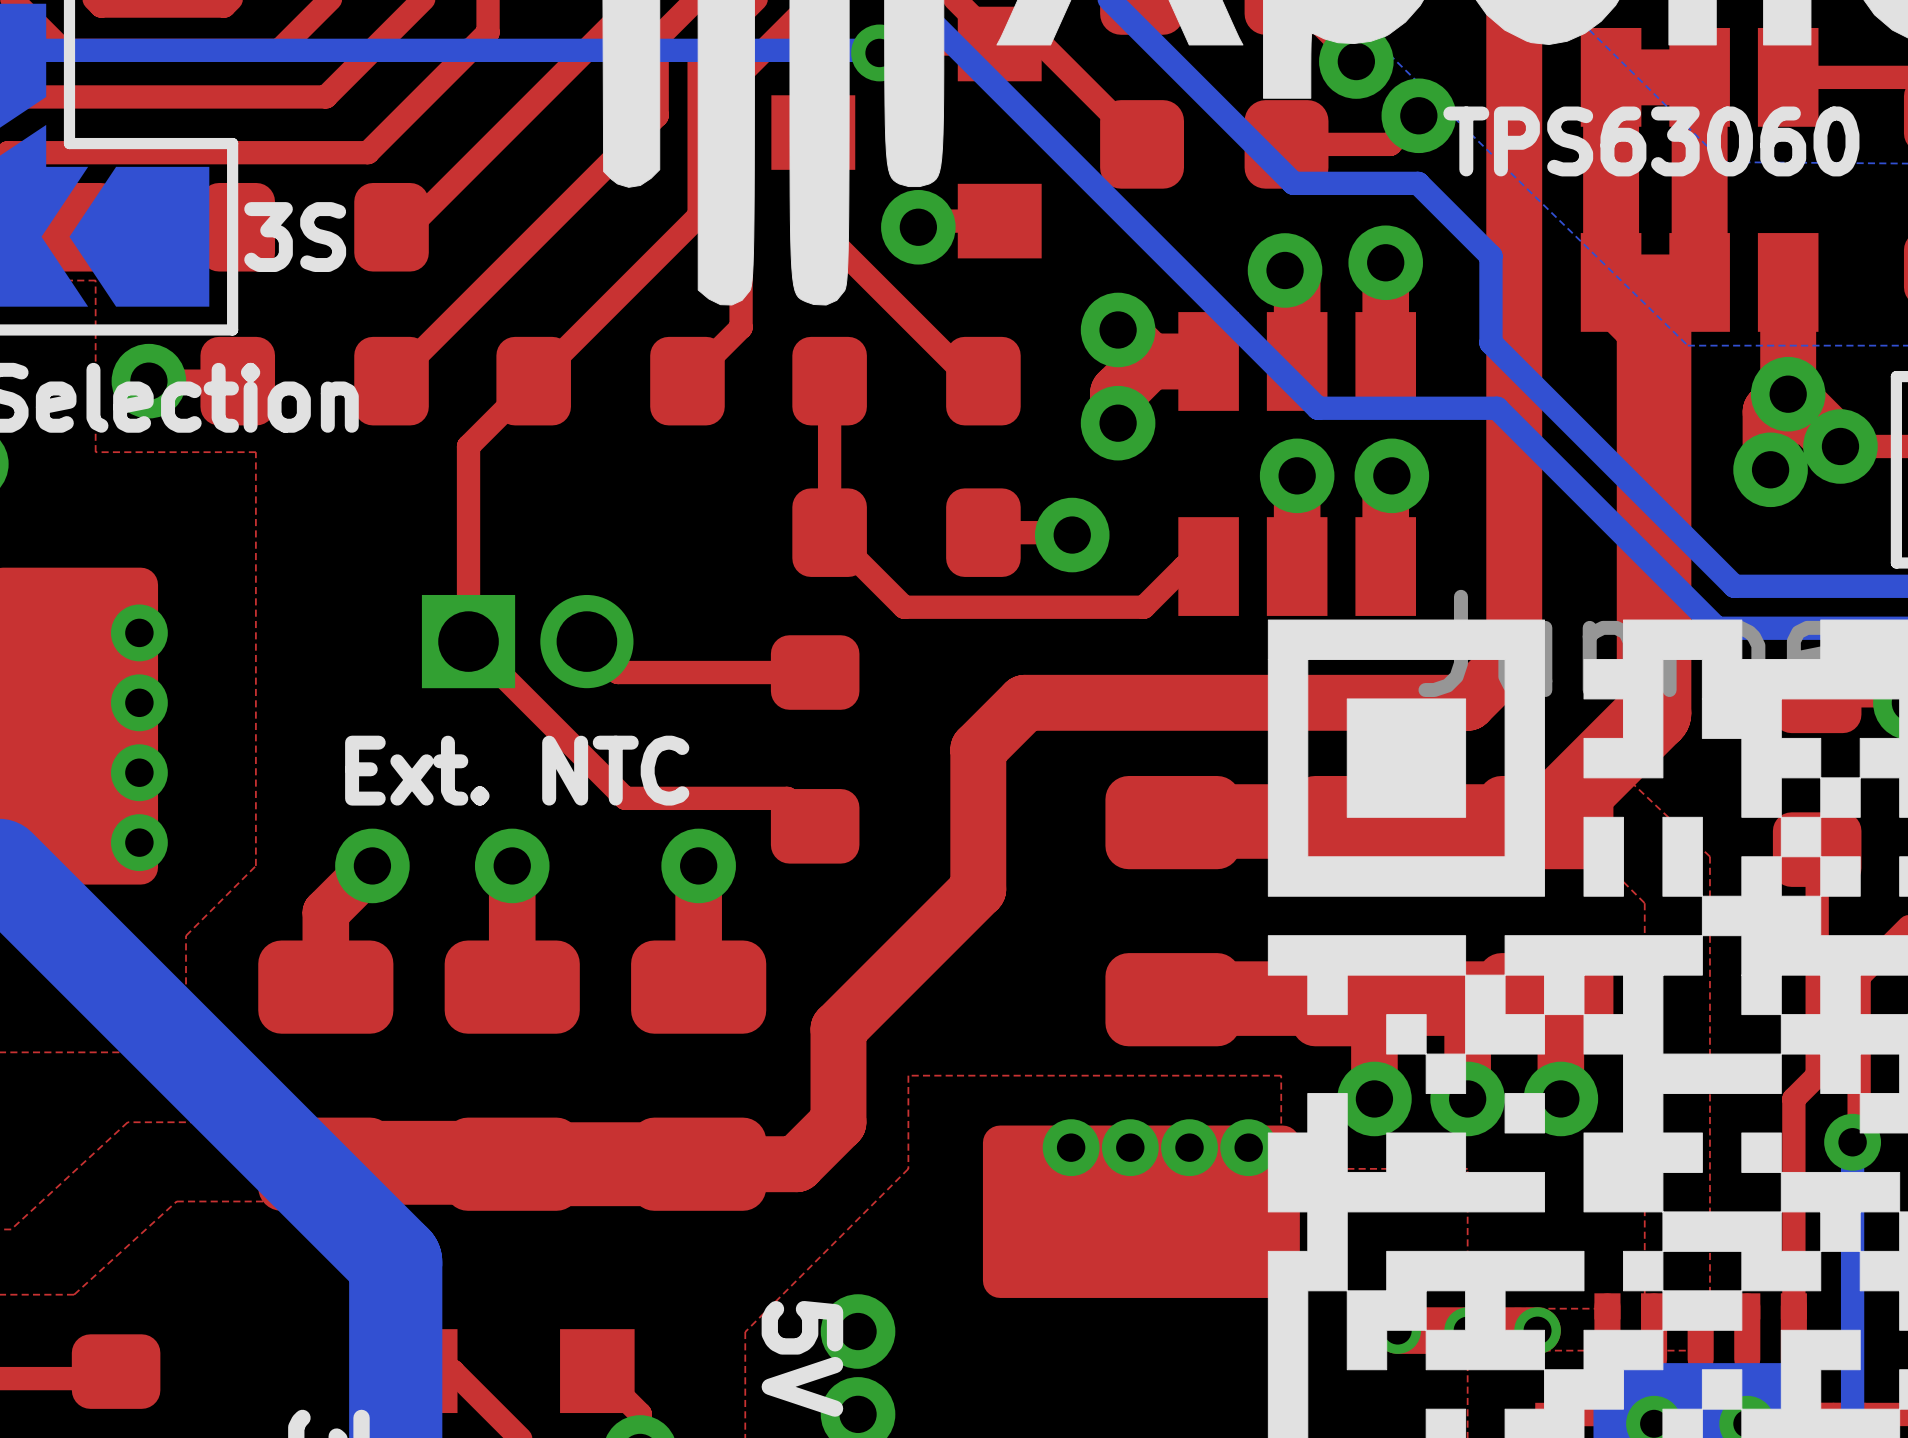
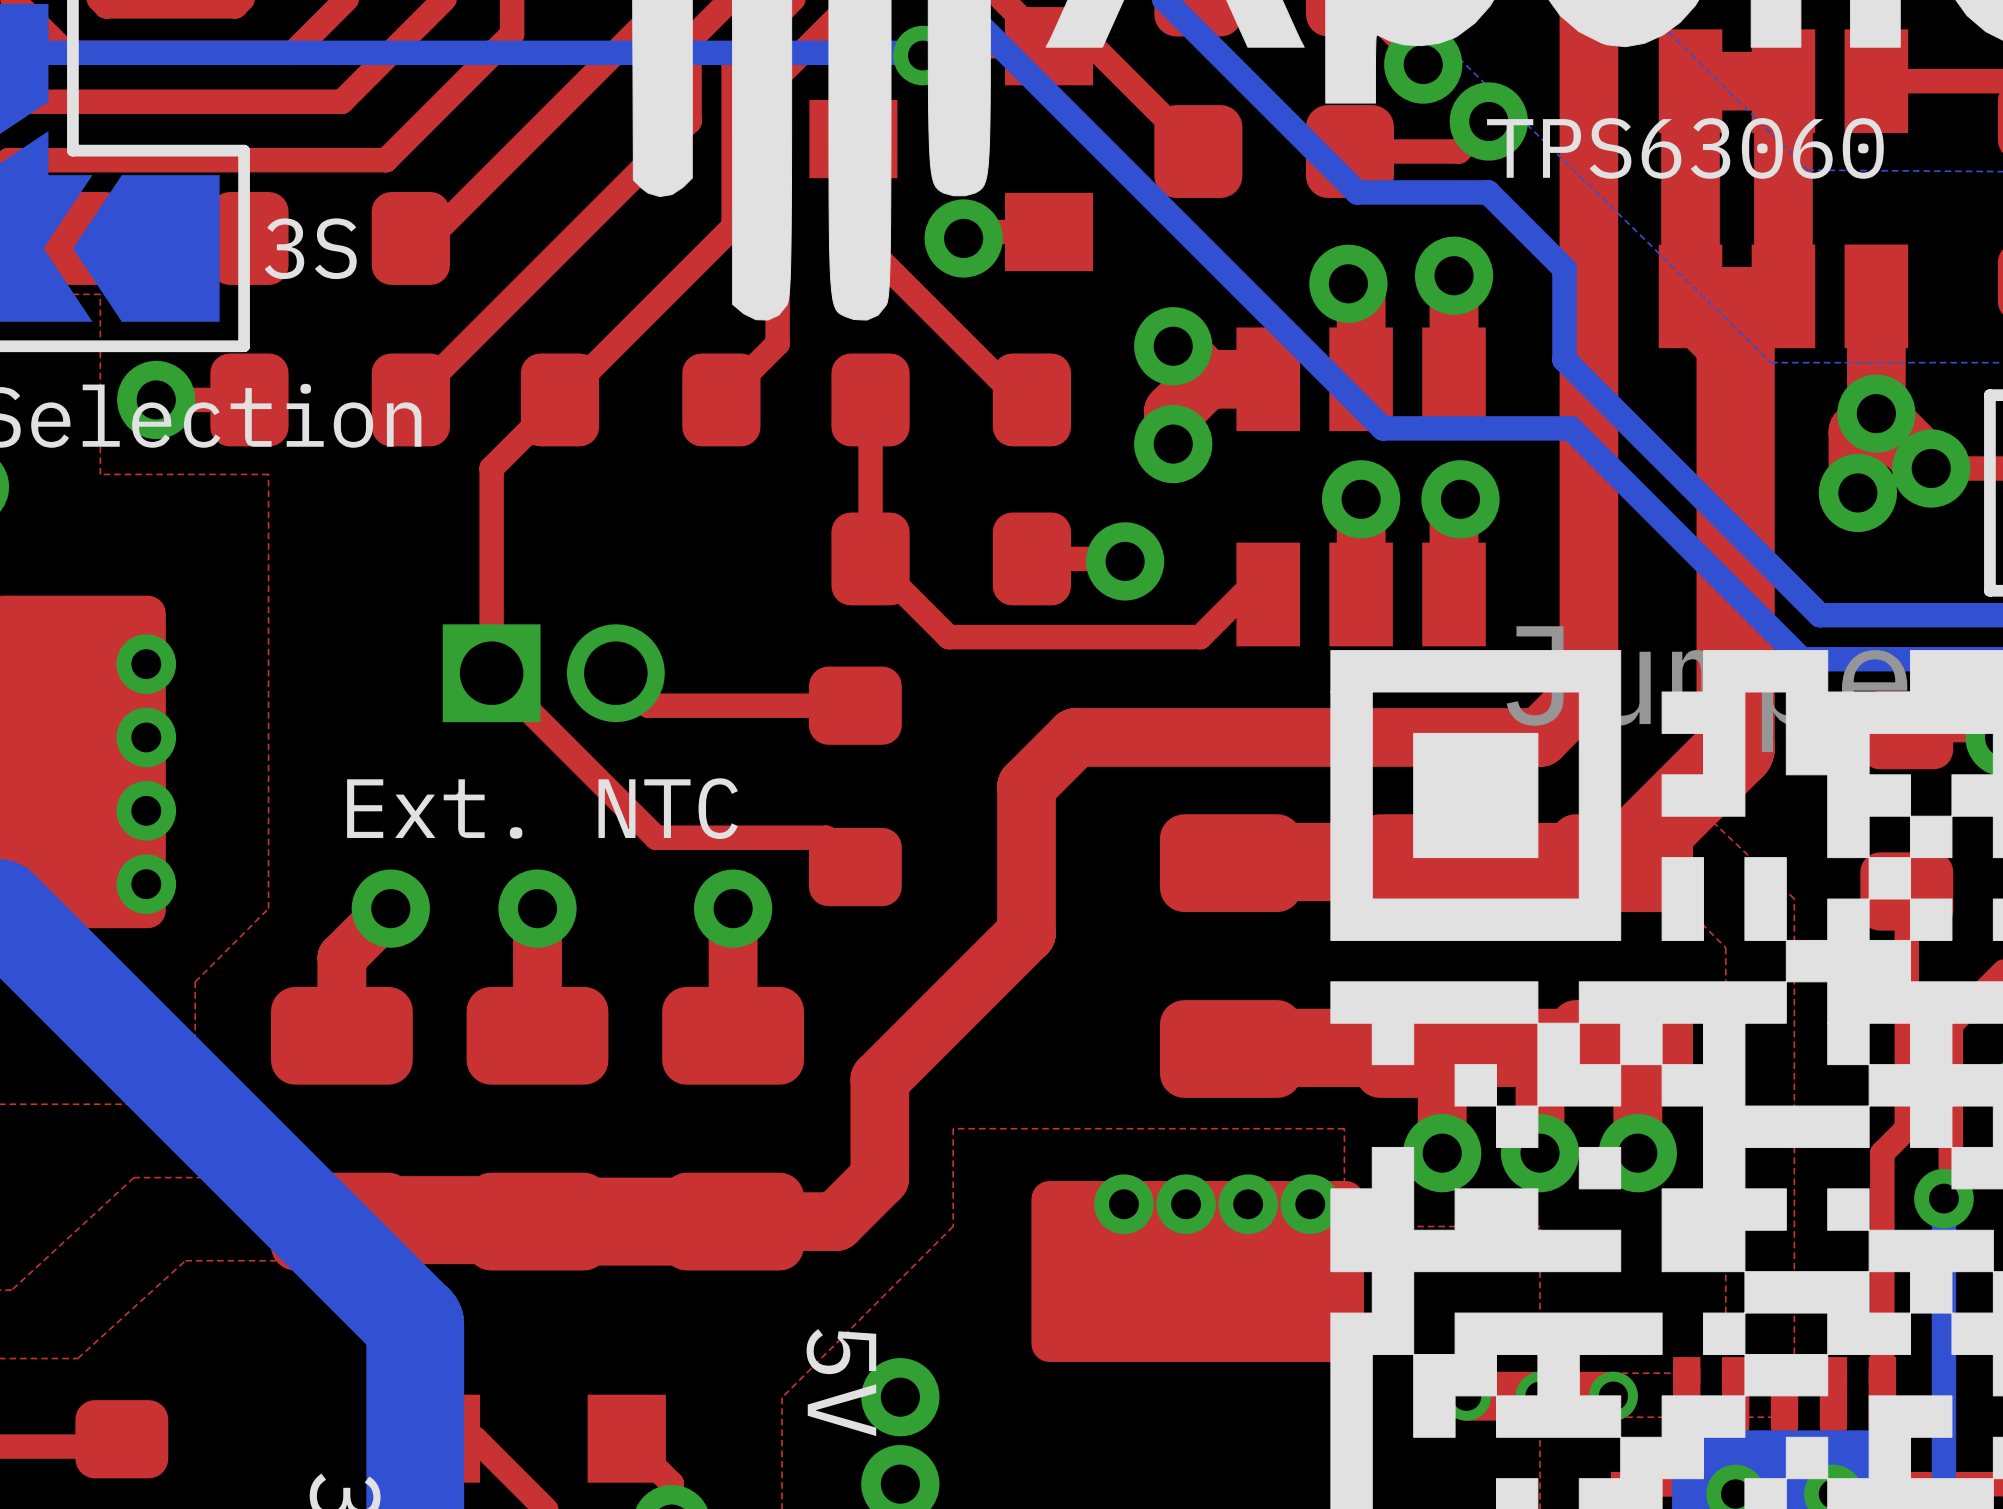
text position: TPS63060 (1651, 141) -> TPS63060 (1685, 148)

